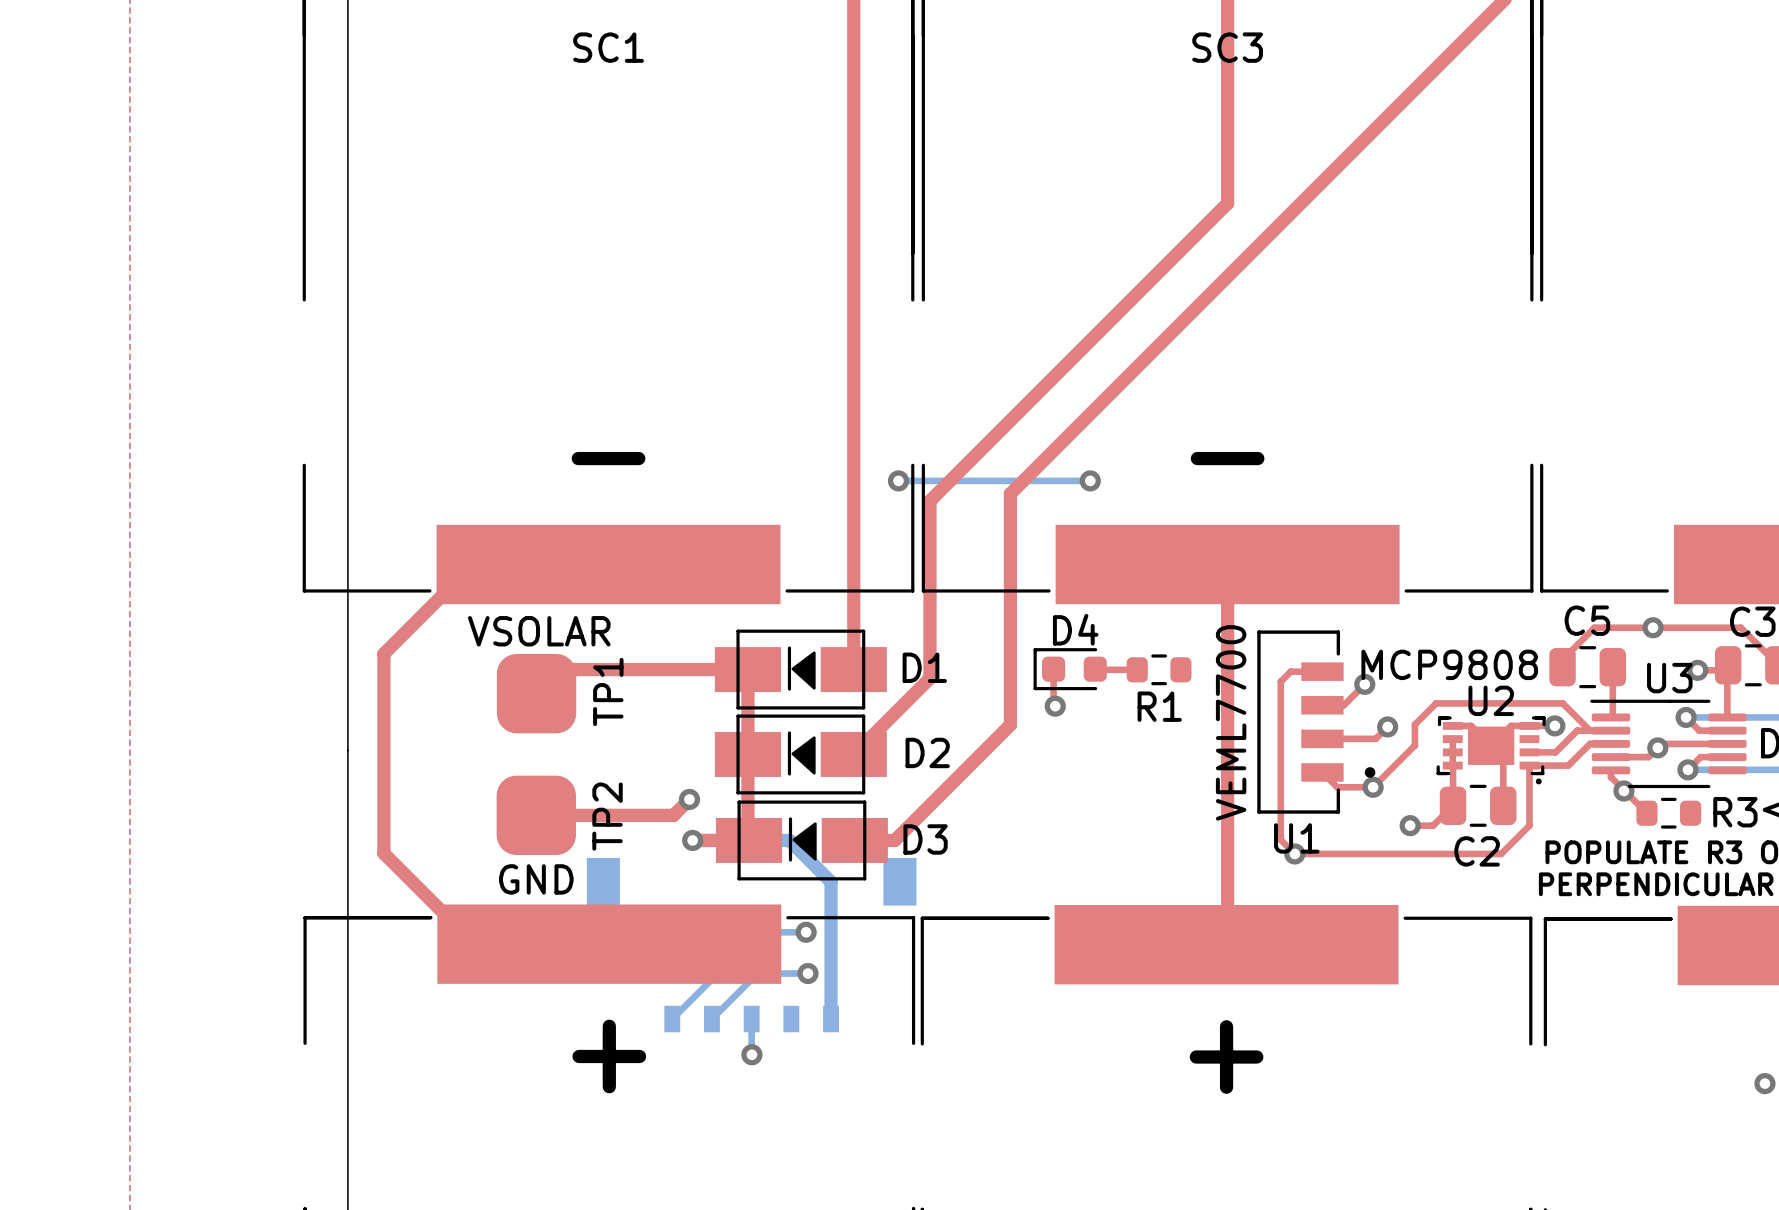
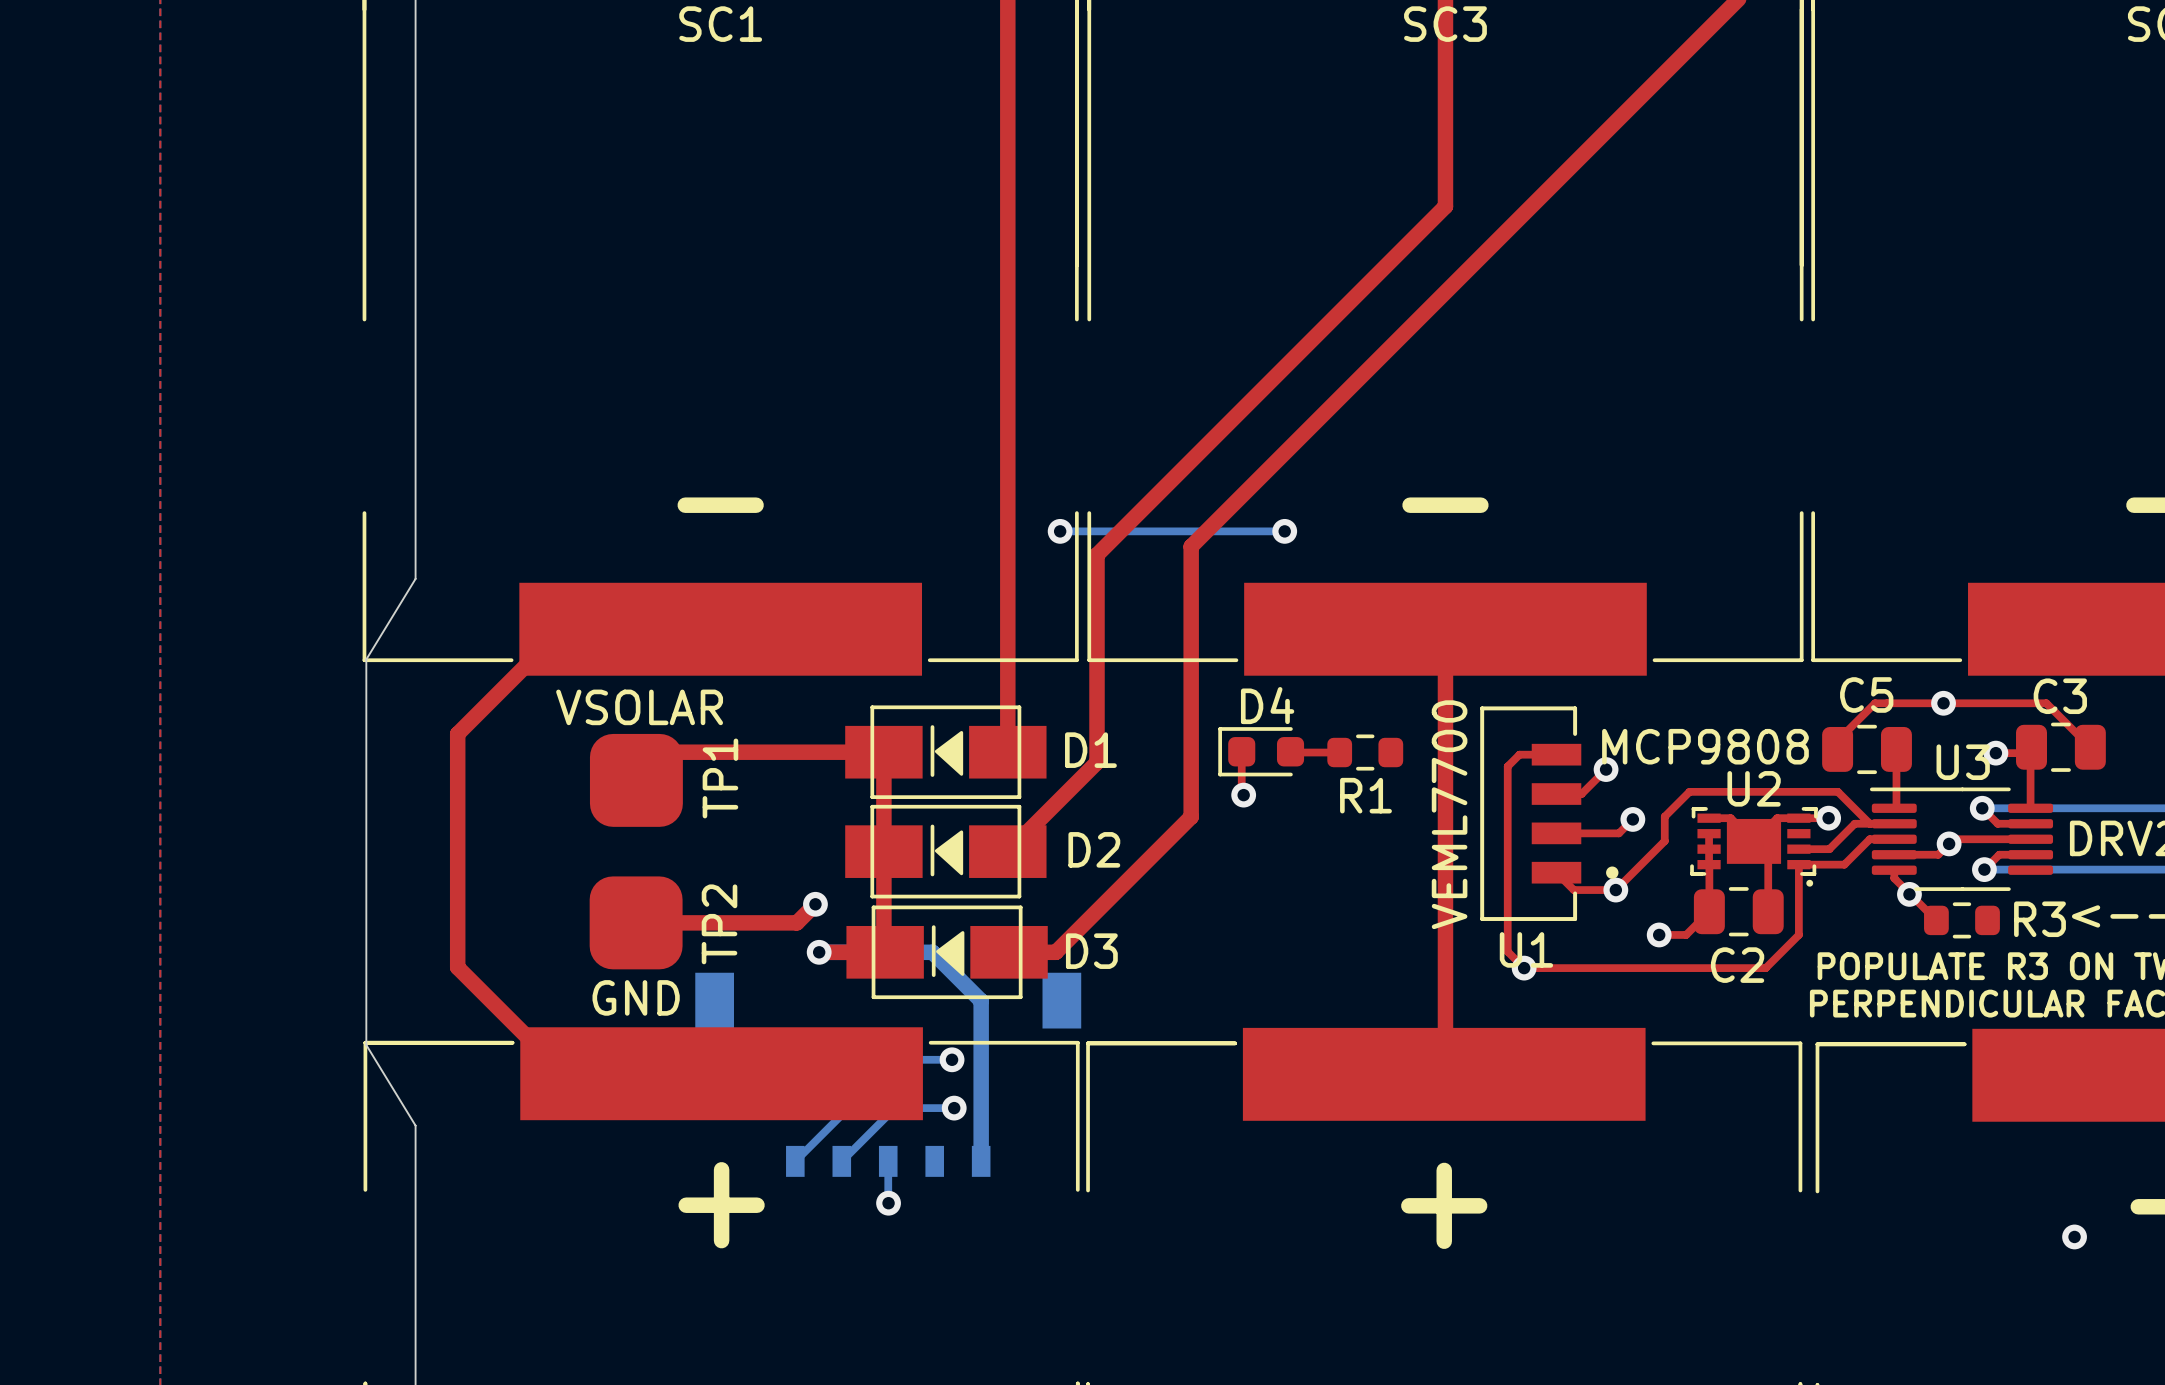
board edge: (347, 521) (347, 988) -> (415, 578) (366, 659) (366, 1045) (415, 1125)

